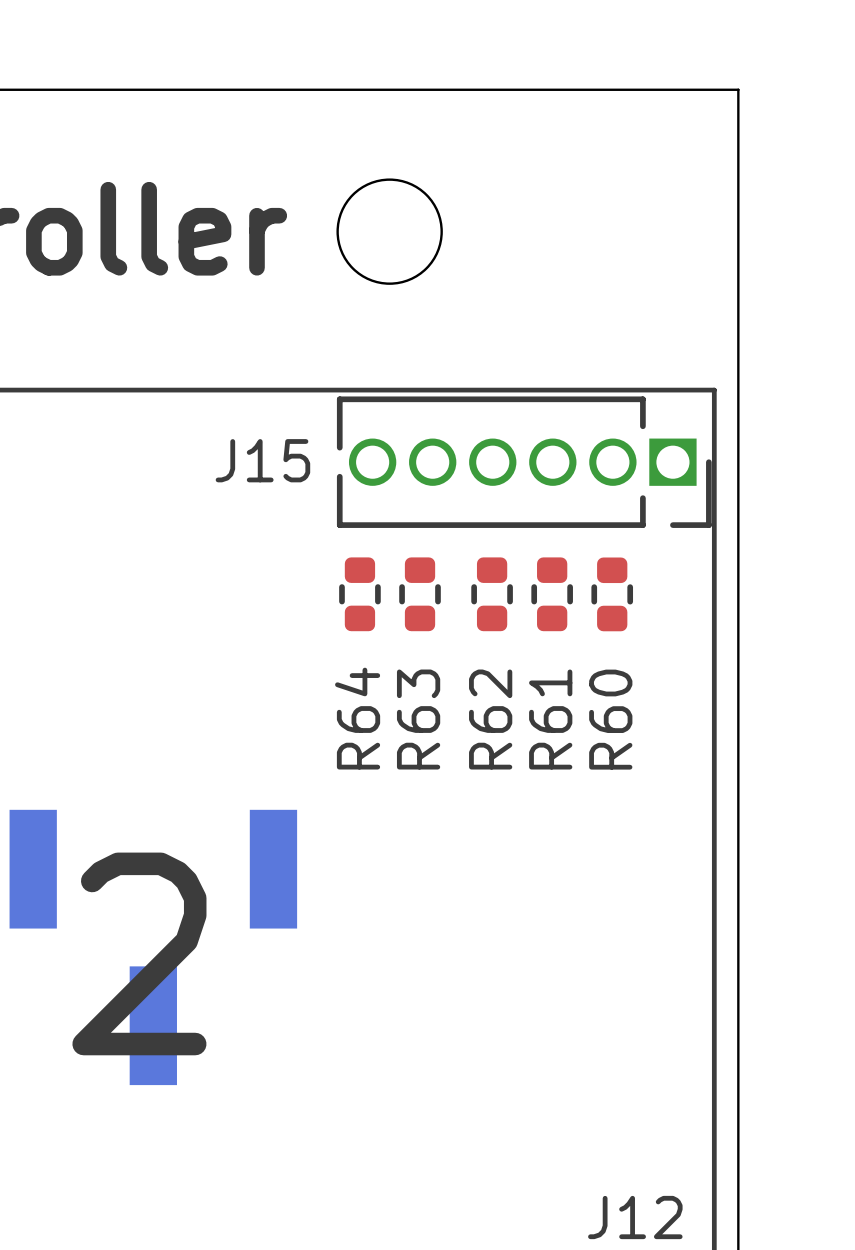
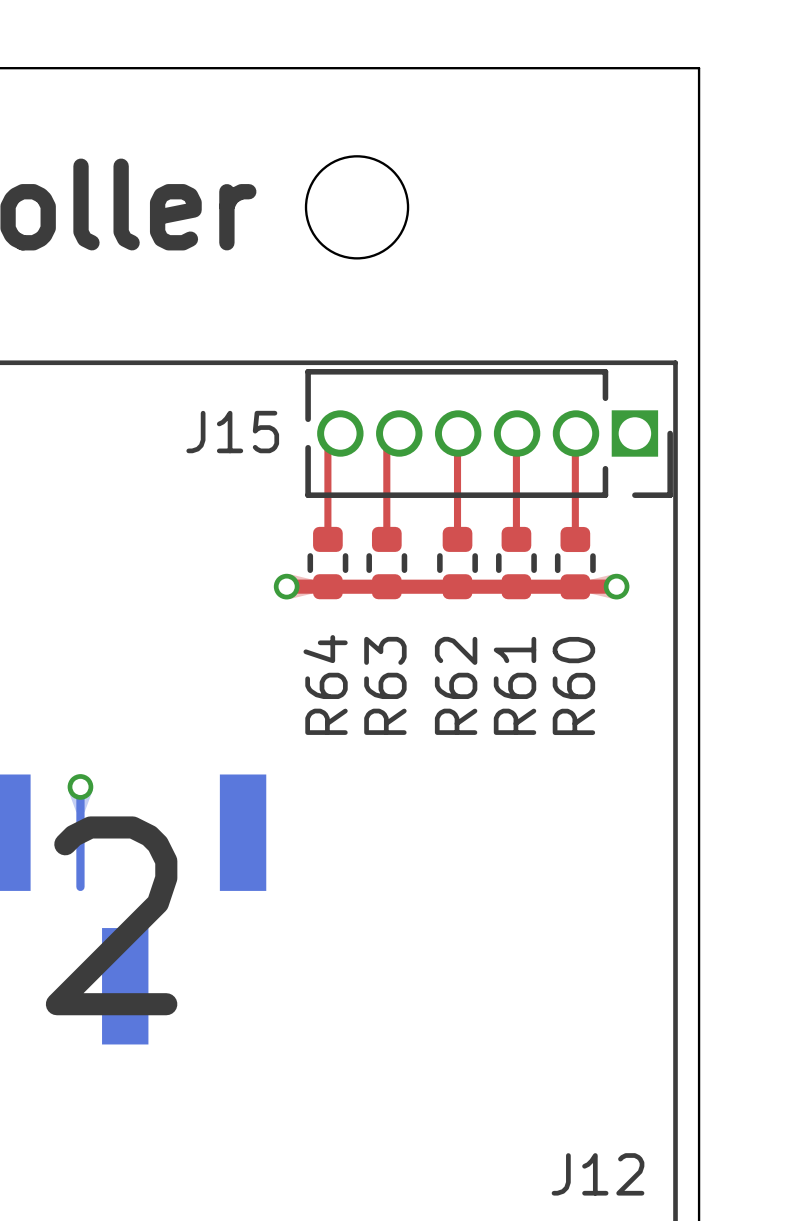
top track: none -> (340, 433) (327, 445) (327, 539)
top track: none -> (399, 433) (386, 445) (386, 539)
top track: none -> (457, 434) (457, 539)
top track: none -> (516, 434) (516, 539)
top track: none -> (575, 434) (575, 539)
top track: none -> (286, 586) (616, 586)
via: none -> (286, 586)
via: none -> (616, 586)
bottom track: none -> (80, 786) (80, 886)
via: none -> (80, 786)

